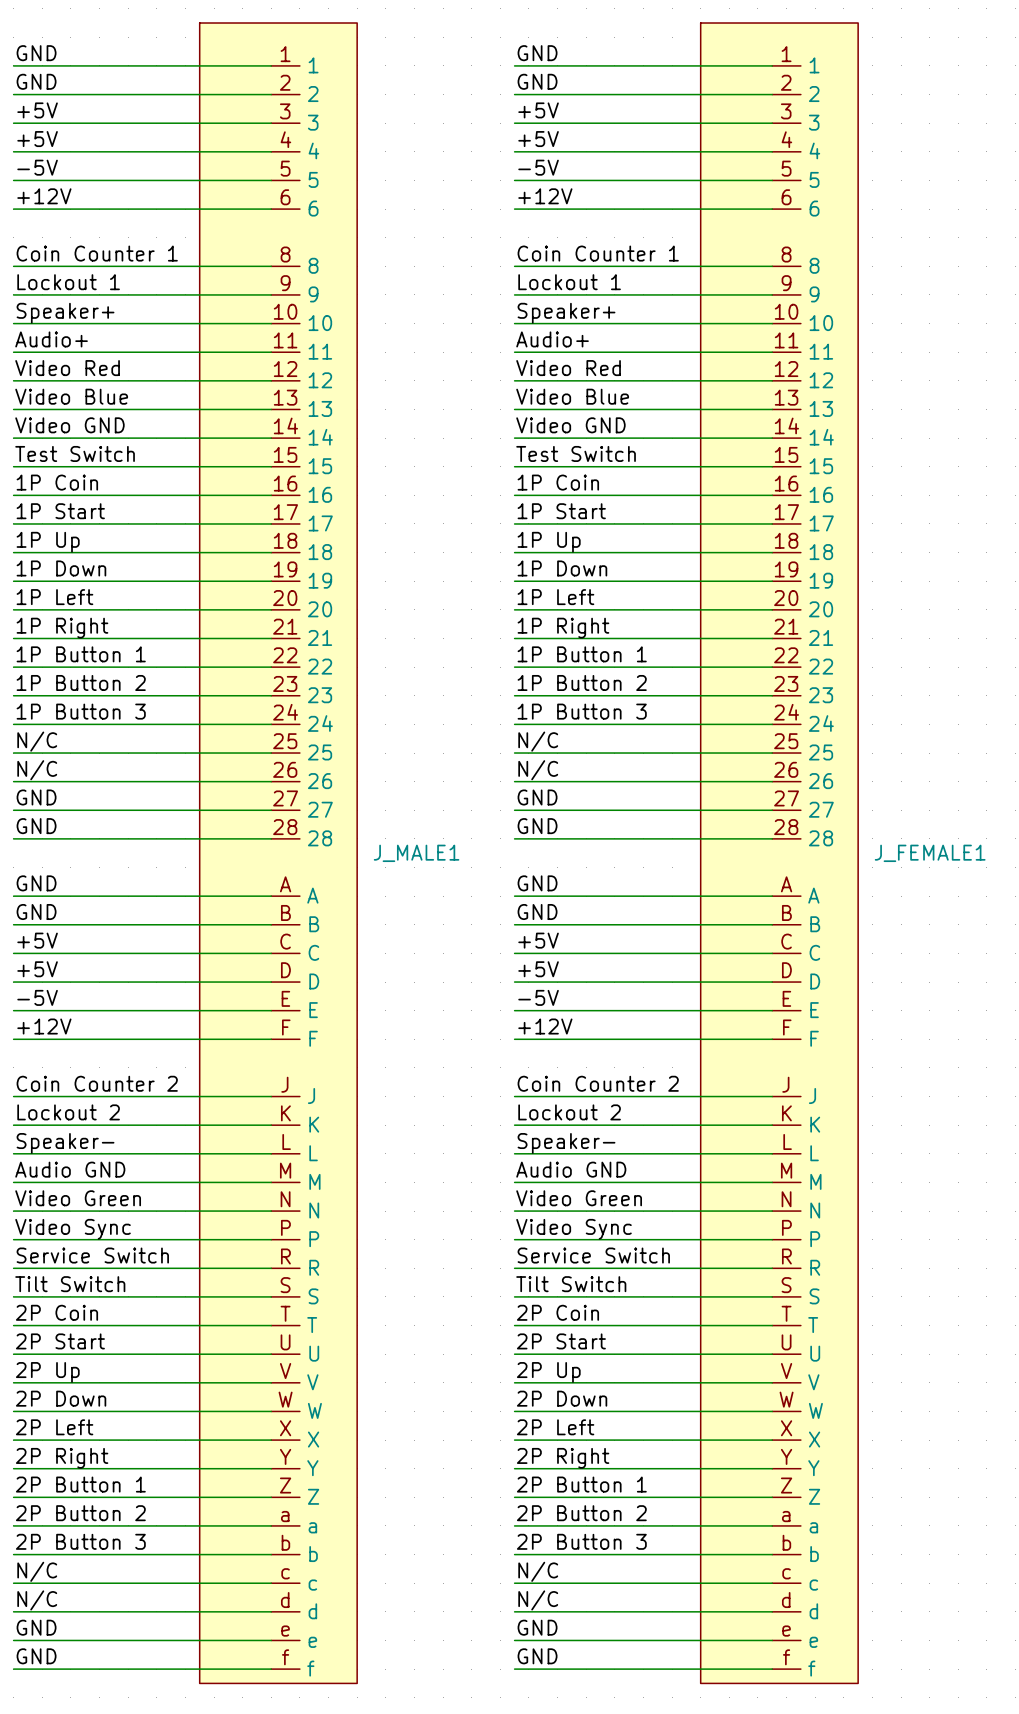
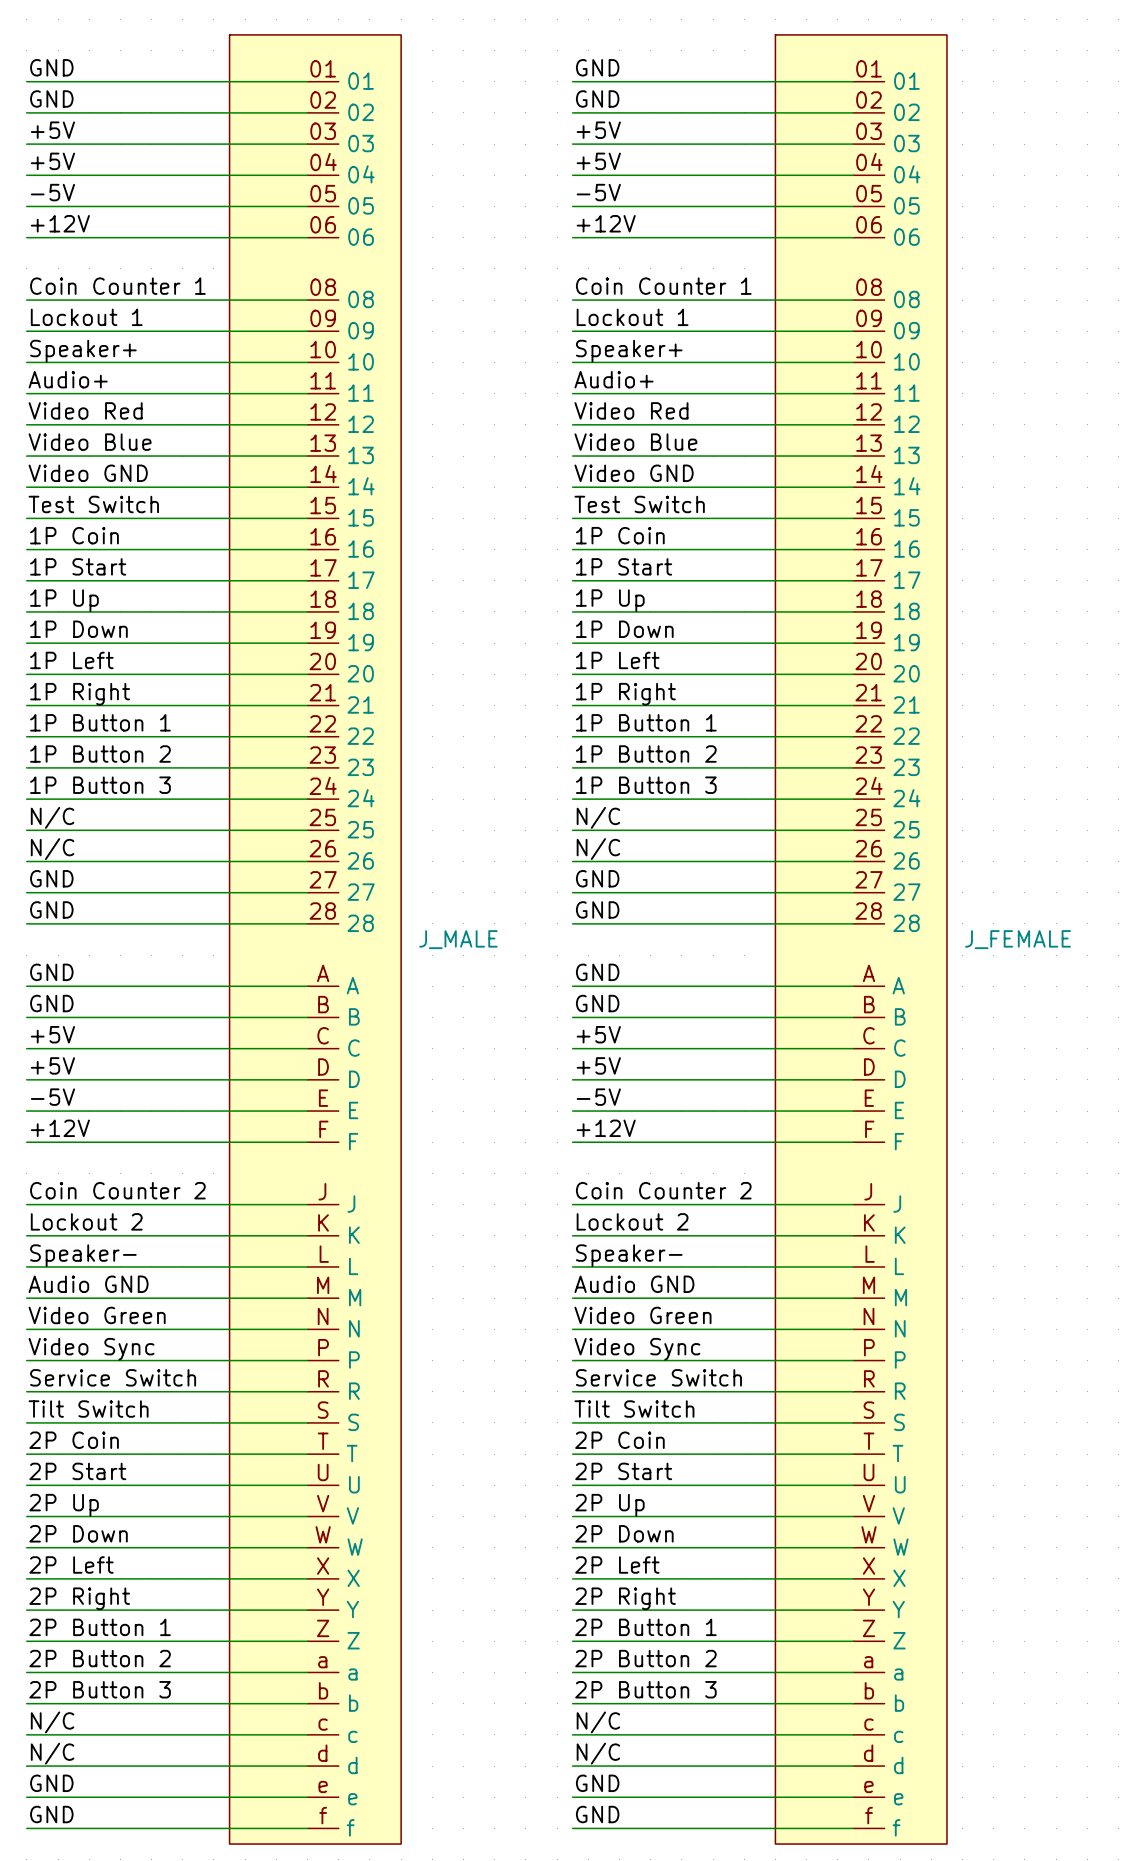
J_MALE1 symbol: [199, 22, 358, 1684] -> [229, 34, 402, 1845]
J_FEMALE1 symbol: [700, 22, 859, 1684] -> [775, 34, 948, 1845]
J_MALE1 name: J_MALE1 (416, 853) -> J_MALE (458, 939)
J_FEMALE1 name: J_FEMALE1 (930, 853) -> J_FEMALE (1018, 939)

